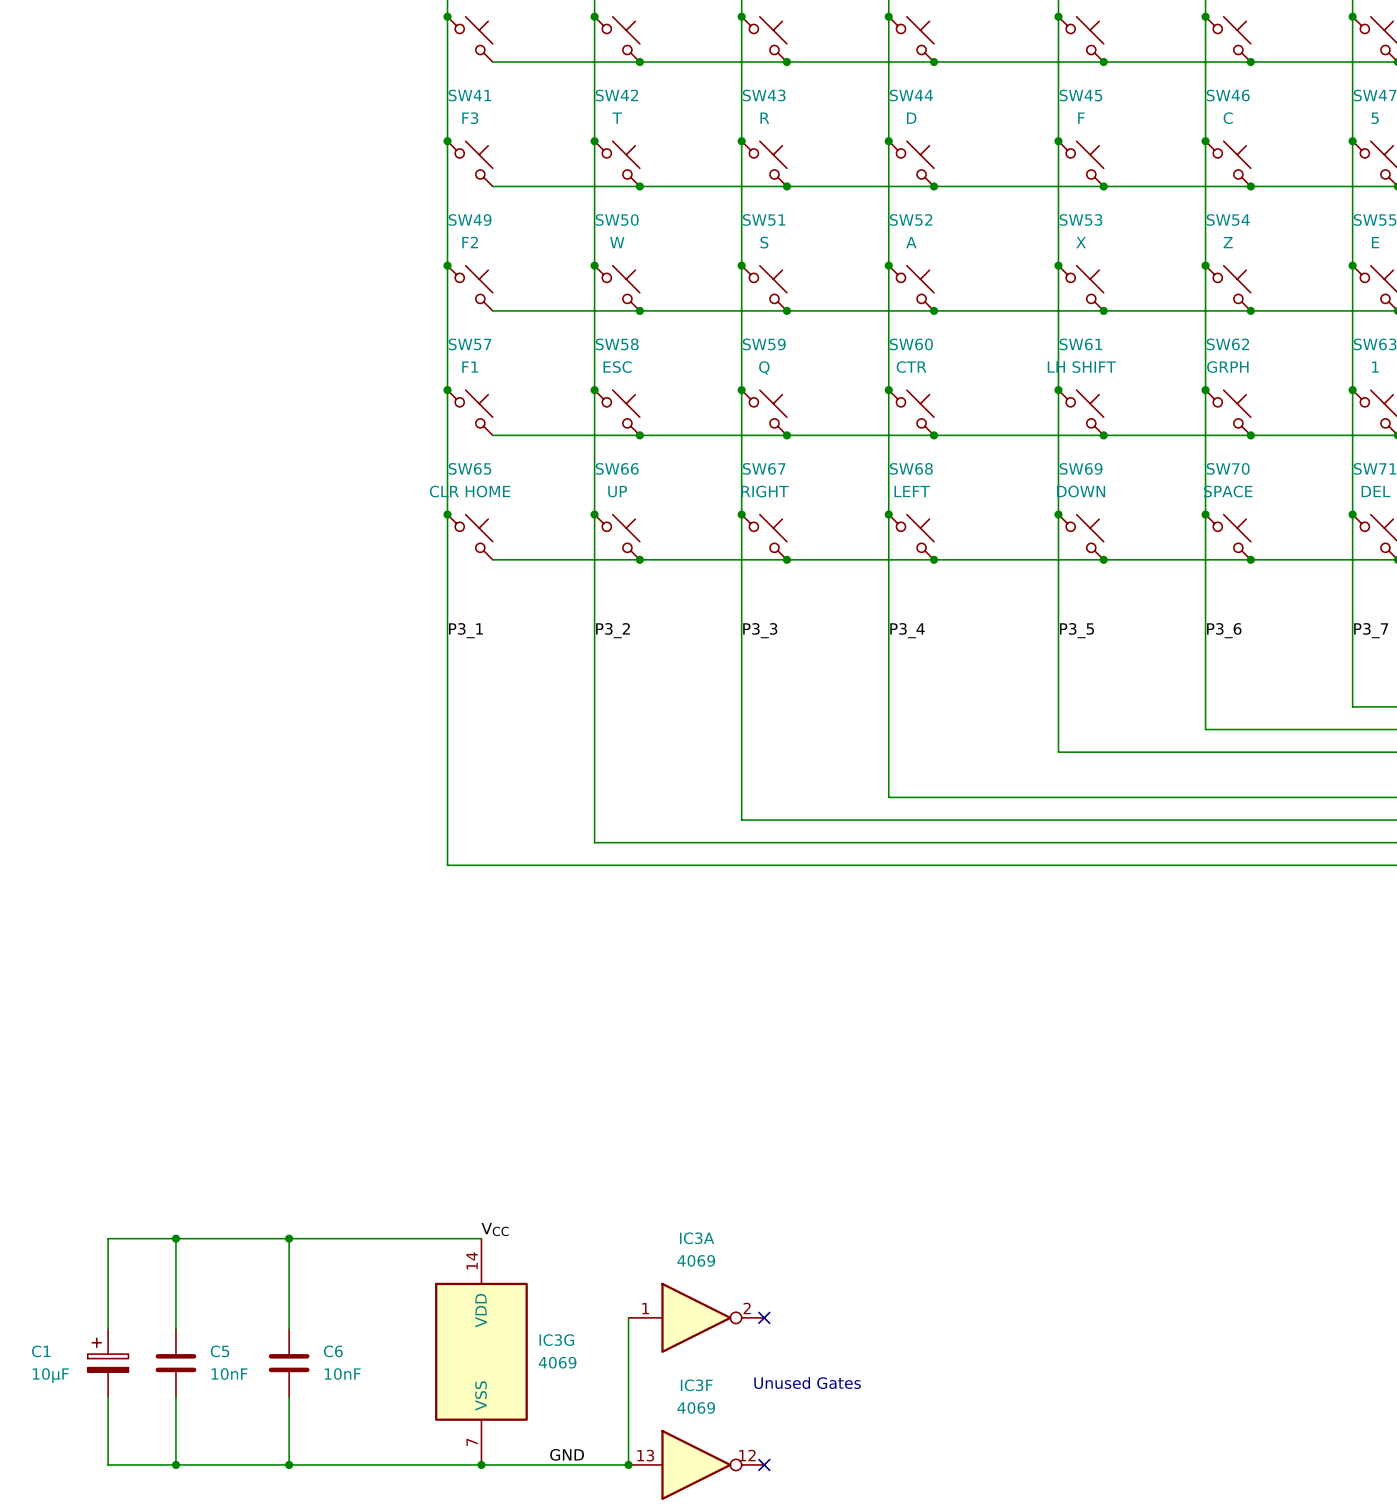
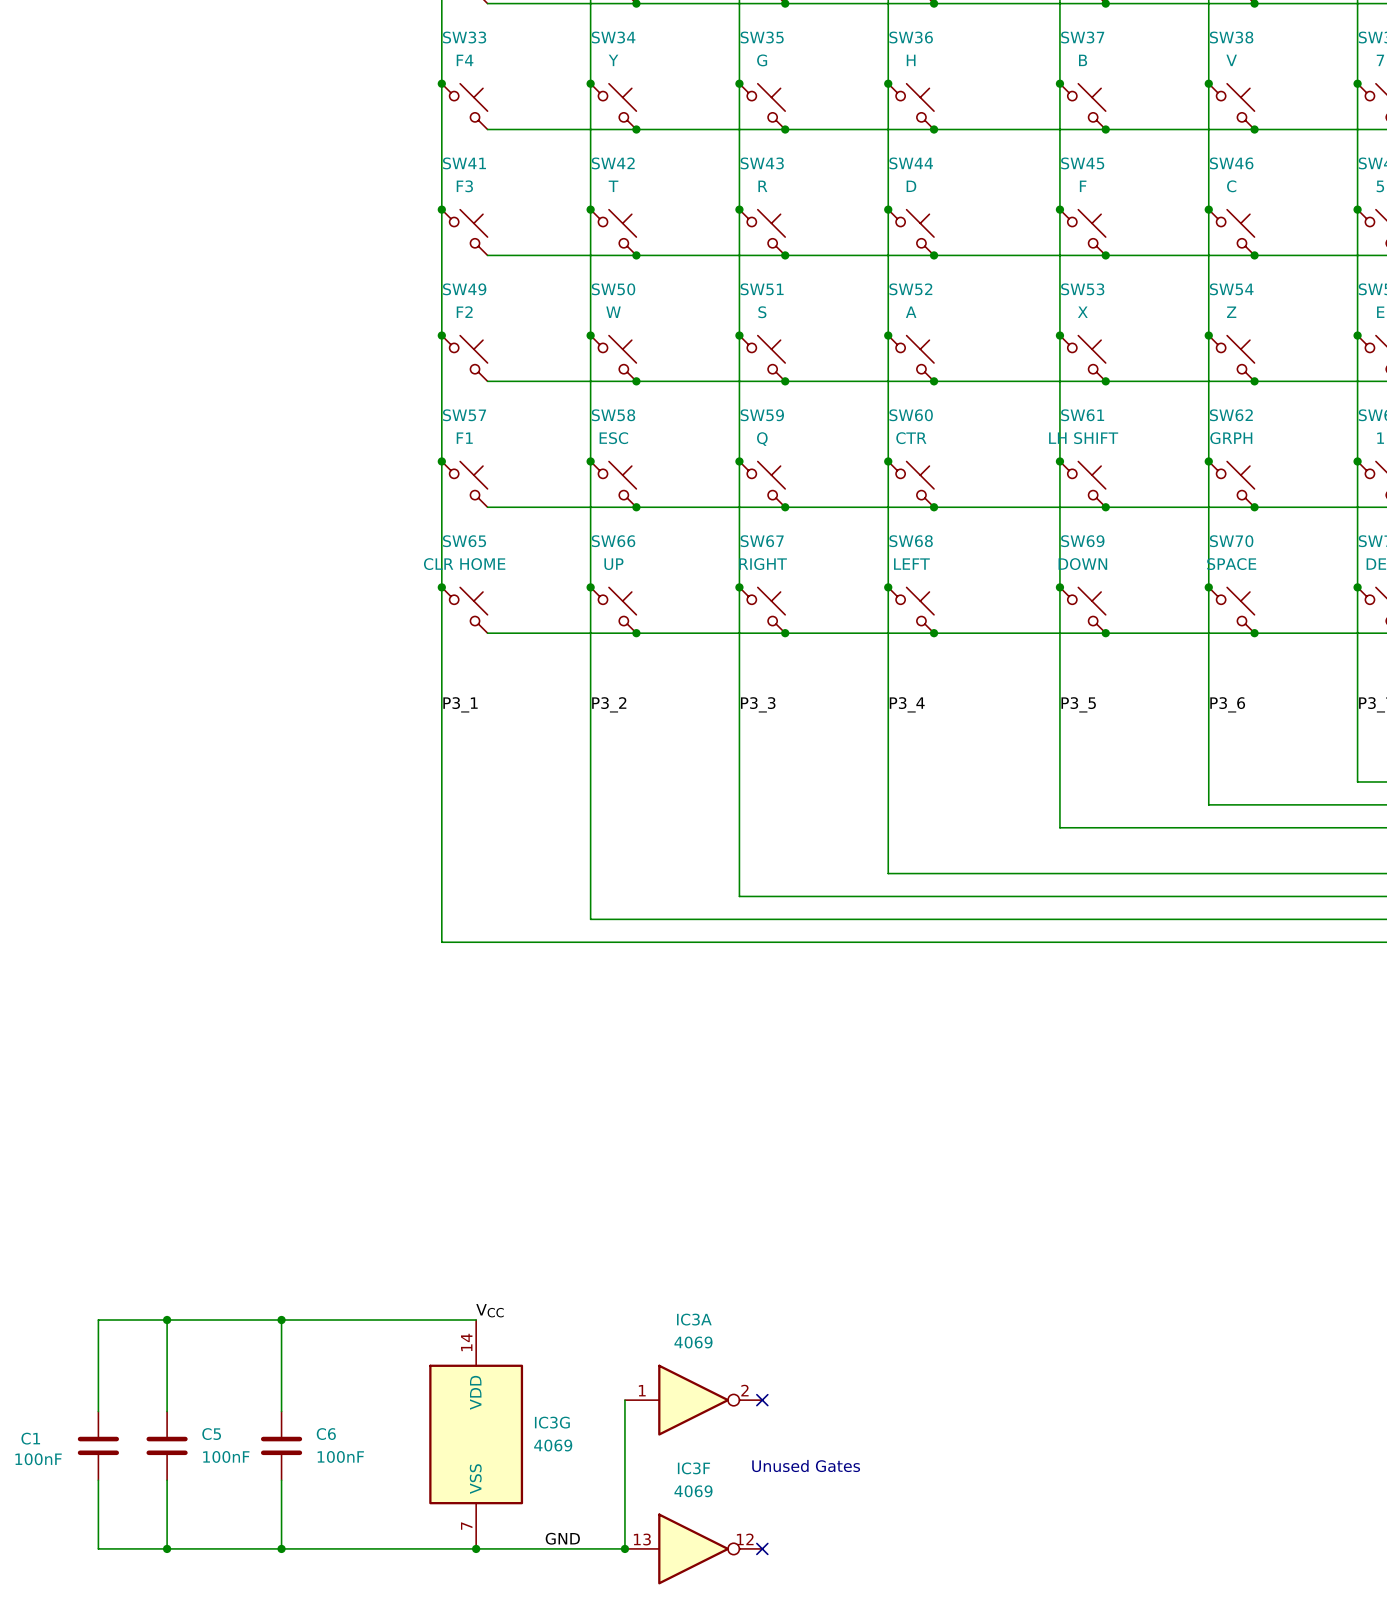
C1 symbol: [87, 1329, 129, 1398] -> [77, 1411, 120, 1481]
C5 value: 10nF (229, 1374) -> 100nF (226, 1456)
C6 value: 10nF (342, 1374) -> 100nF (340, 1456)
C1 value: 10µF (50, 1375) -> 100nF (38, 1459)

